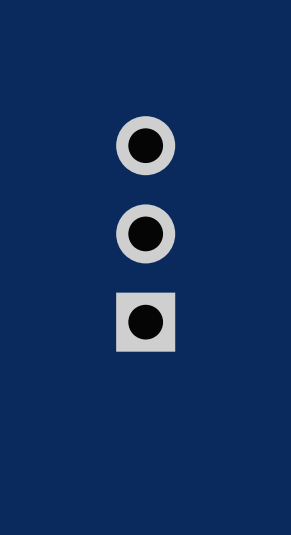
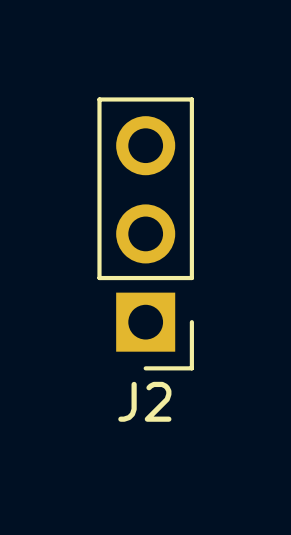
J2 side: top (145, 233) -> bottom (145, 233)

